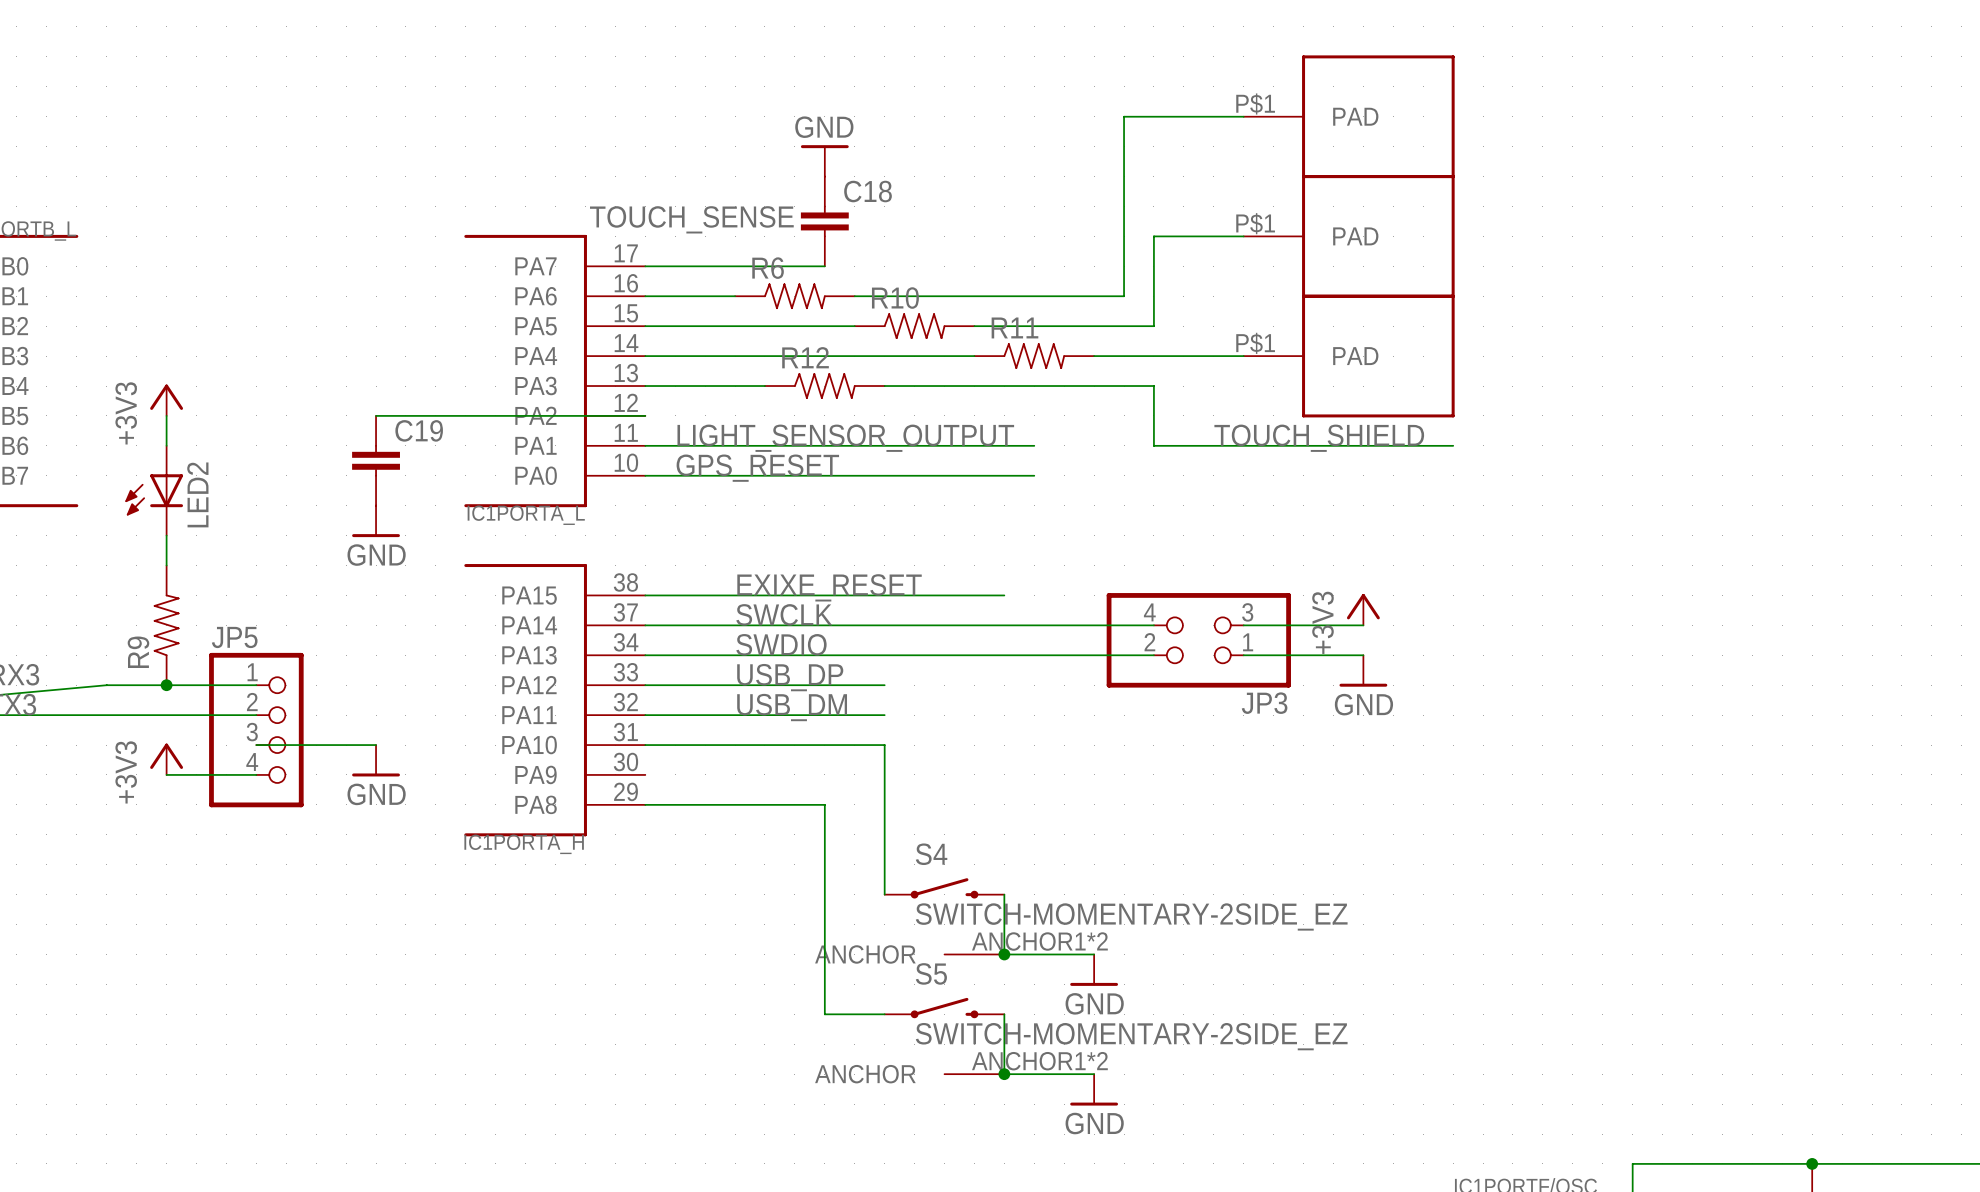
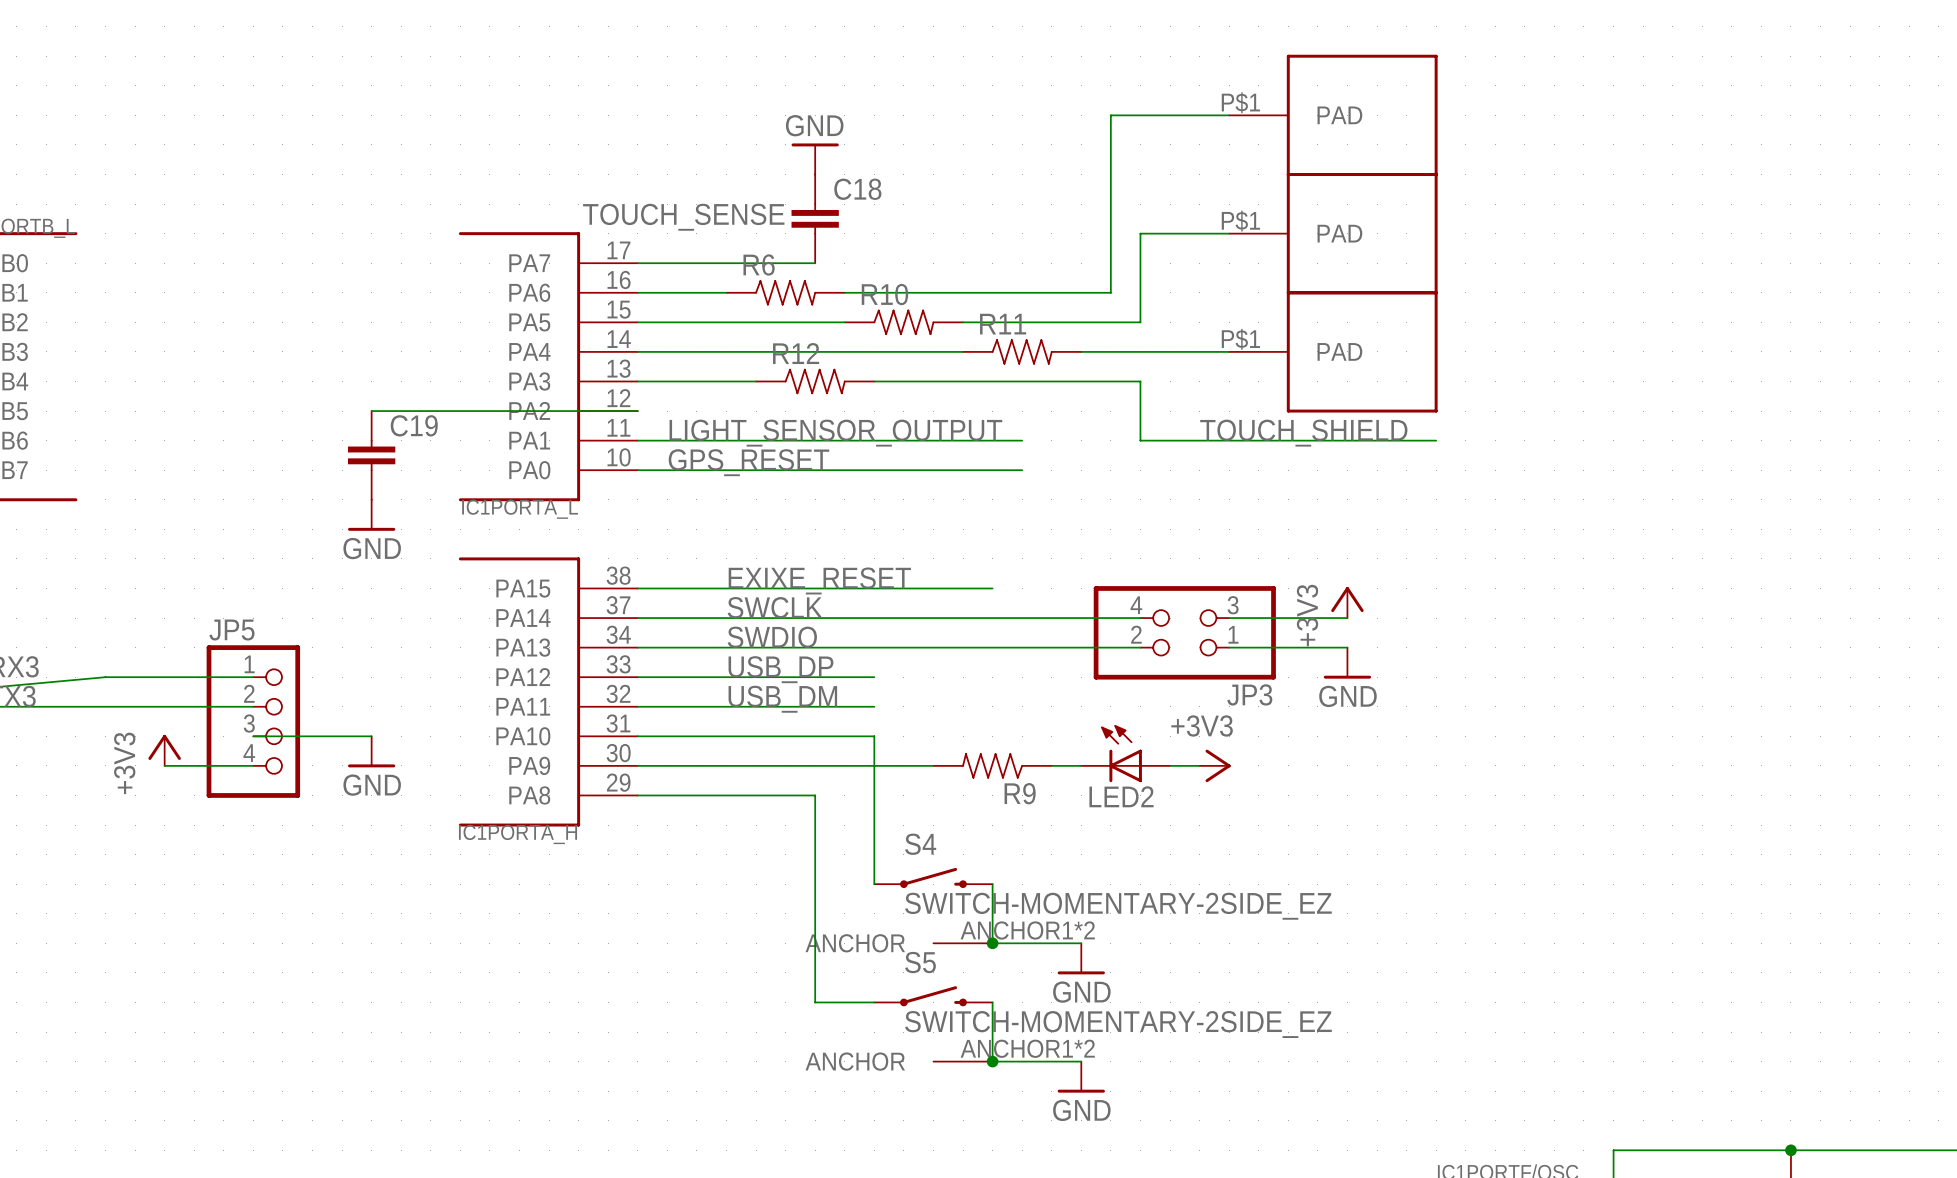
power symbol: +3V3 (166, 400) -> none
wire: (166, 415) (166, 445) -> none
LED2 position: (154, 490) -> (1125, 753)
LED2 rotation: 0° (154, 494) -> 90° clockwise (1121, 753)
wire: (166, 535) (166, 565) -> none
R9 rotation: 0° (166, 625) -> 90° counterclockwise (992, 765)
R9 position: (166, 625) -> (992, 765)
junction: (166, 685) -> none
wire: none -> (637, 765) (933, 765)
wire: none -> (1051, 765) (1081, 765)
wire: none -> (1170, 765) (1199, 765)
power symbol: none -> +3V3 (1215, 765)

